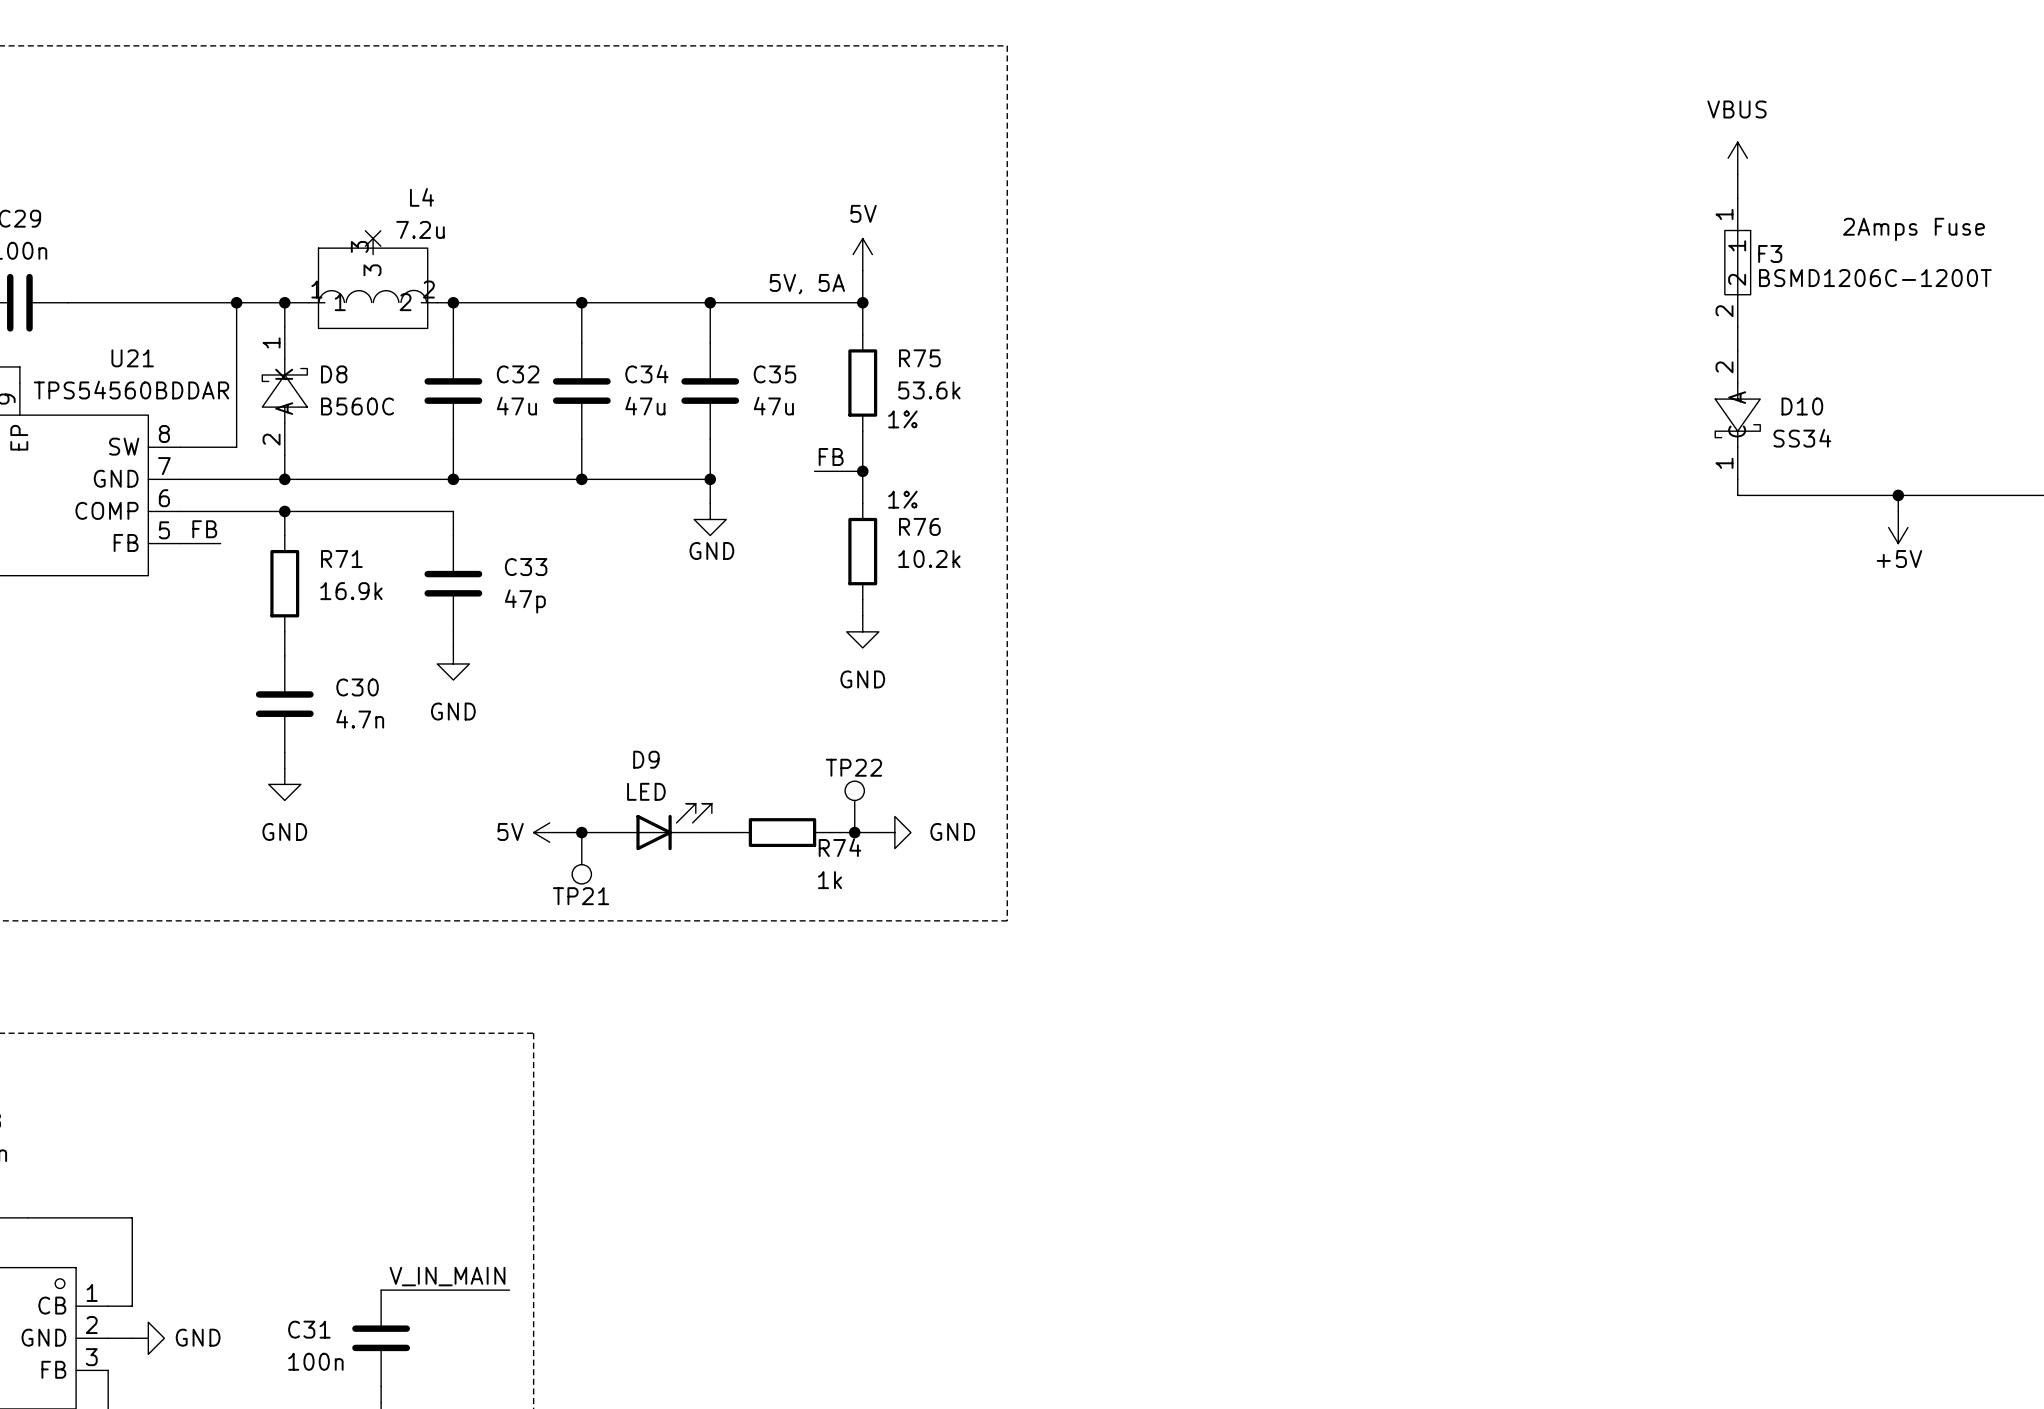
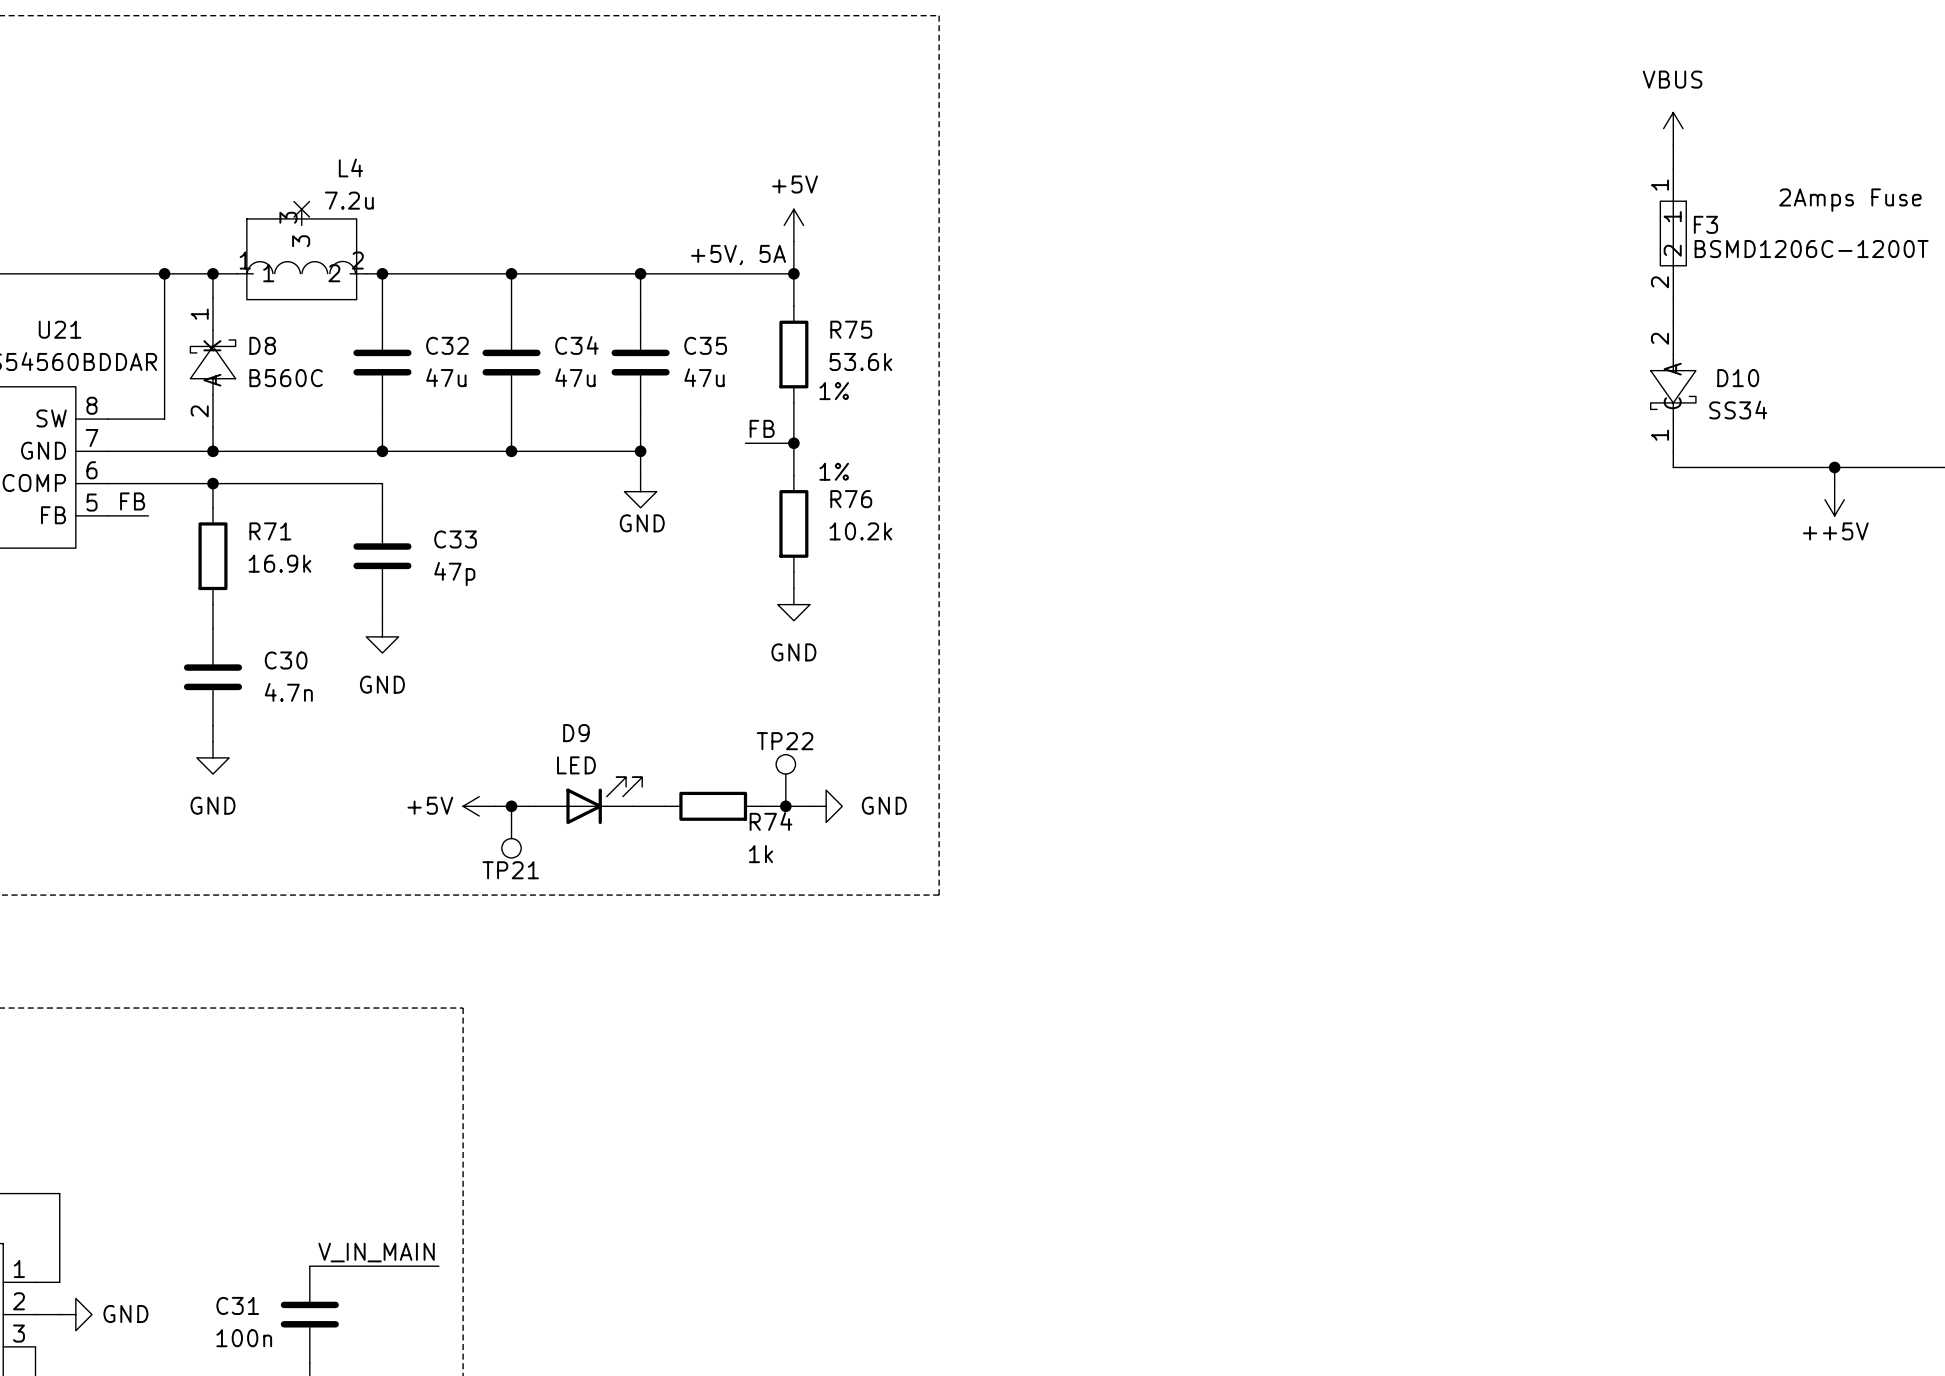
power symbol: 5V (862, 254) -> +5V (793, 225)
text: 5V, 5A (807, 284) -> +5V, 5A (738, 255)
power symbol: +5V (1898, 527) -> ++5V (1834, 499)
power symbol: 5V (549, 832) -> +5V (479, 806)

